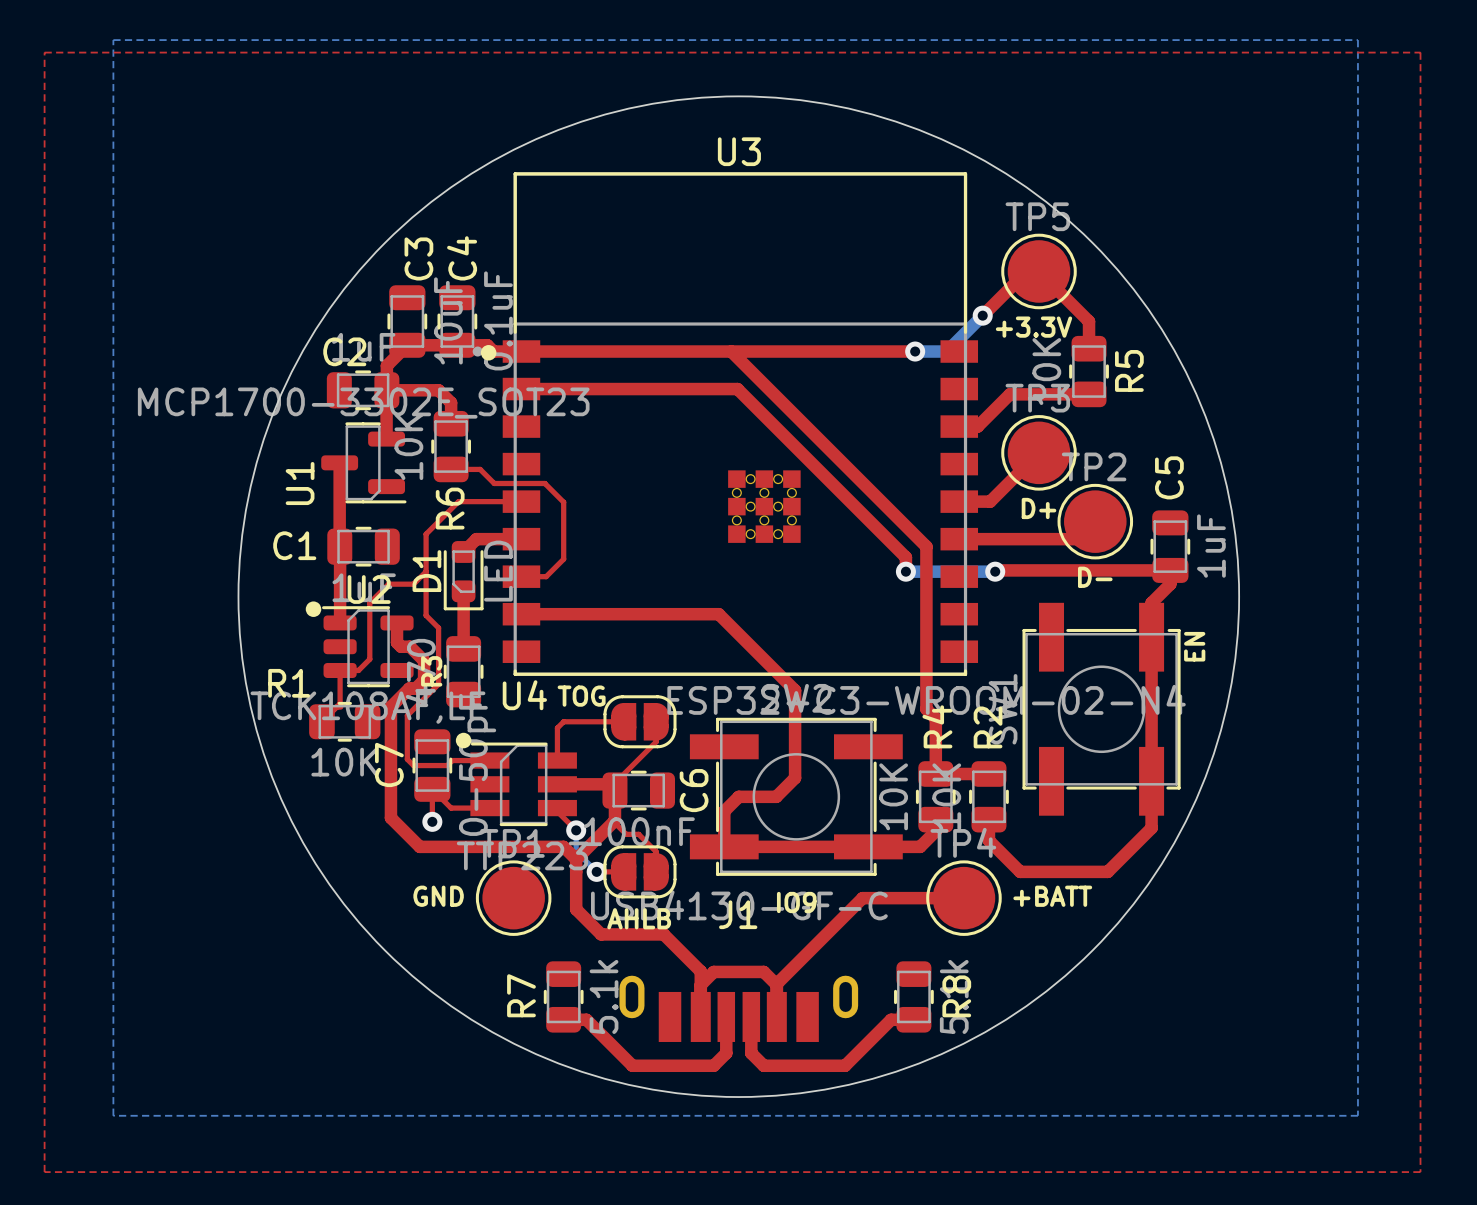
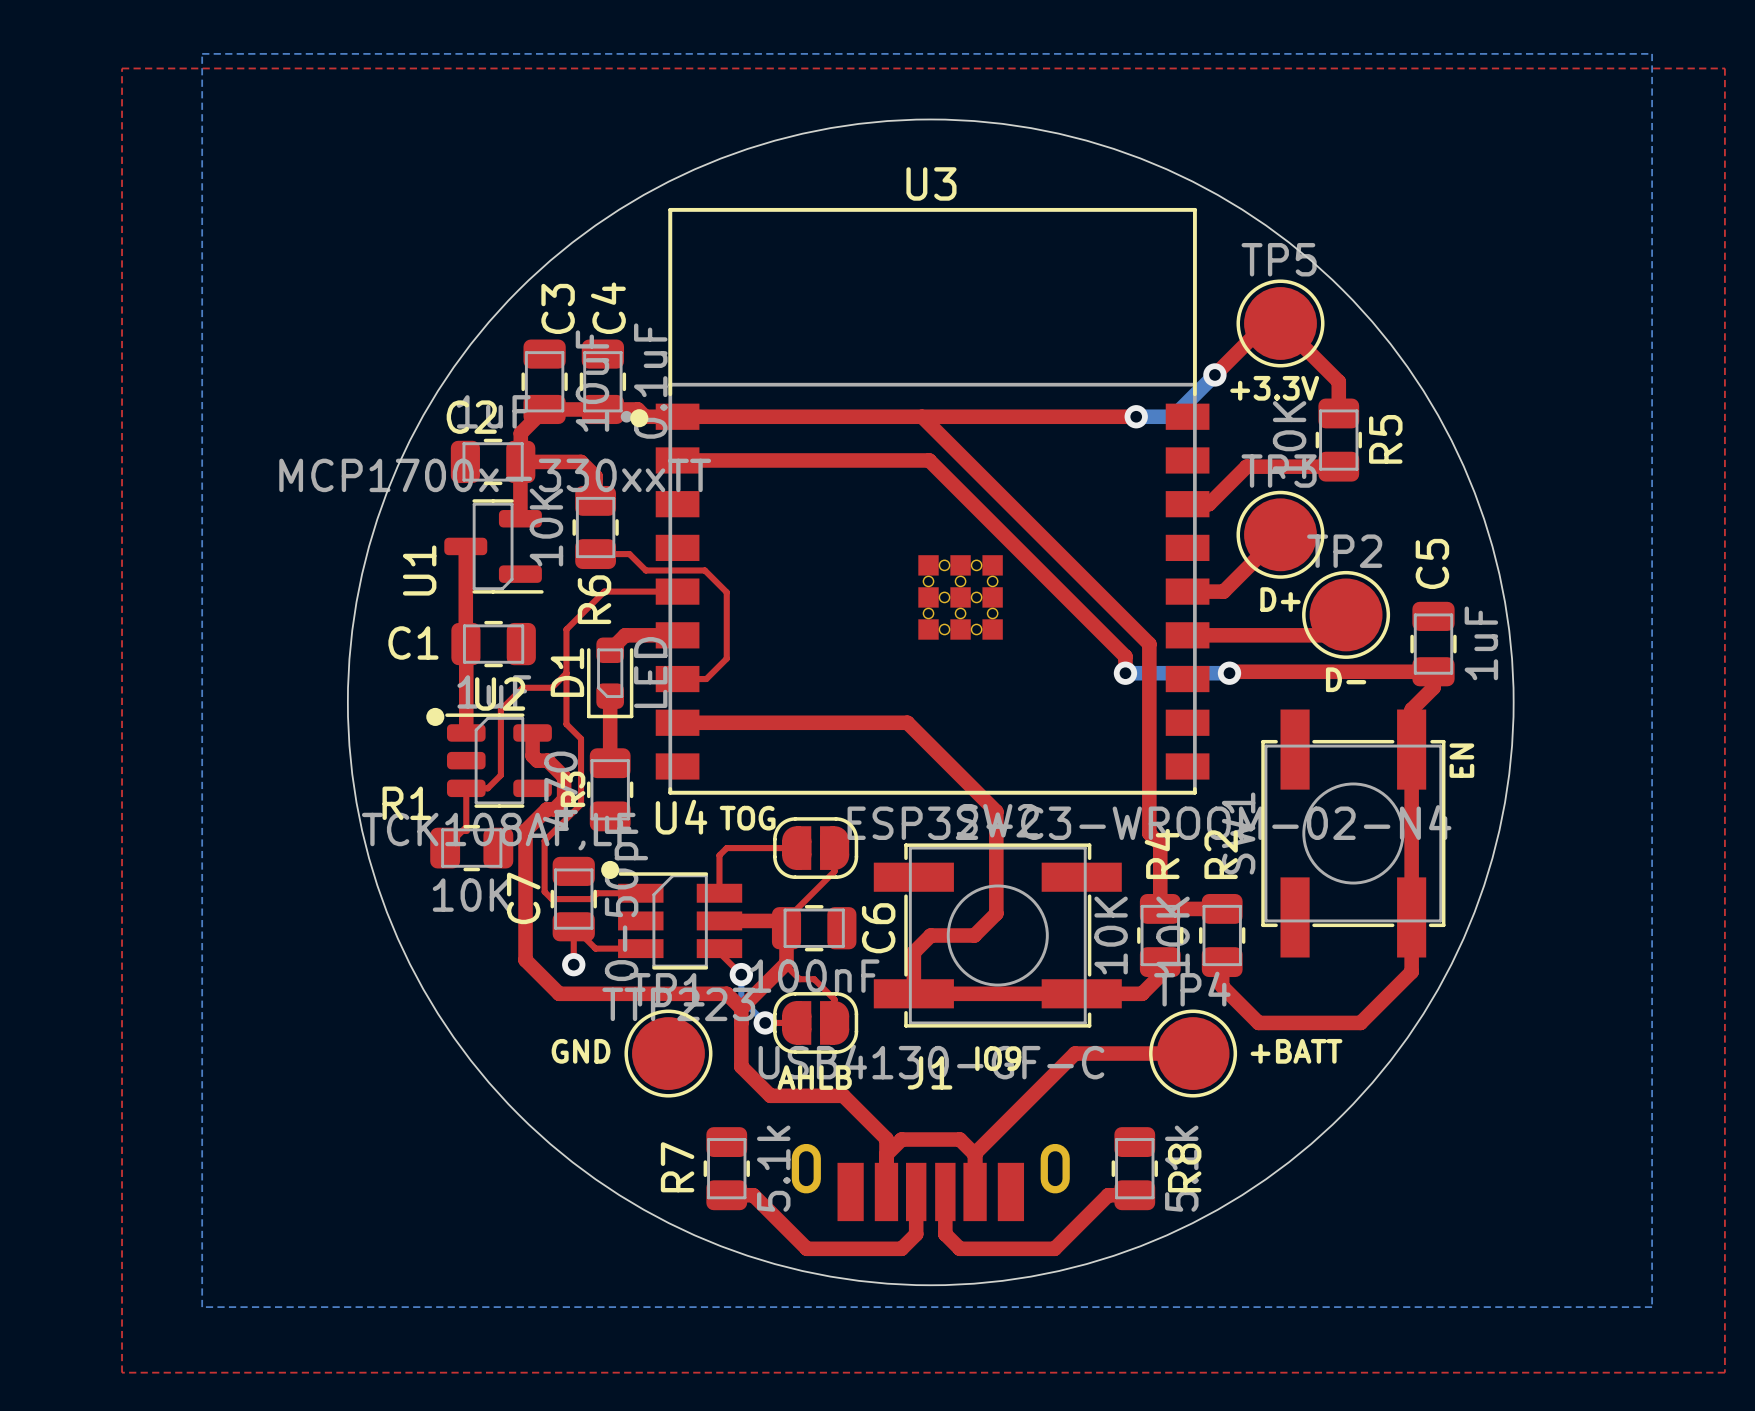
U1 value: MCP1700-3302E_SOT23 (363, 403) -> MCP1700x-330xxTT (495, 475)

